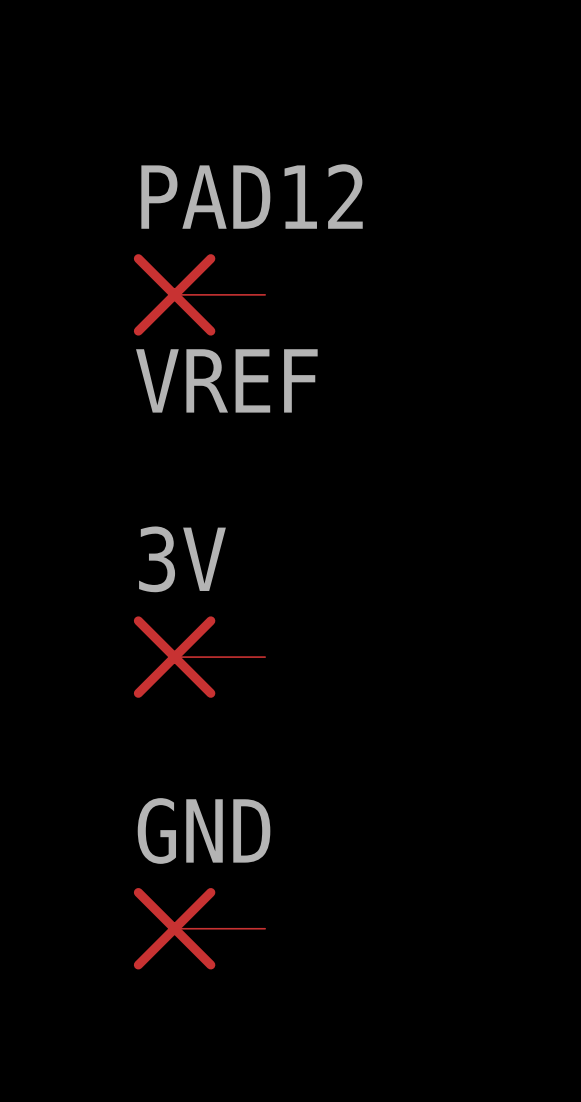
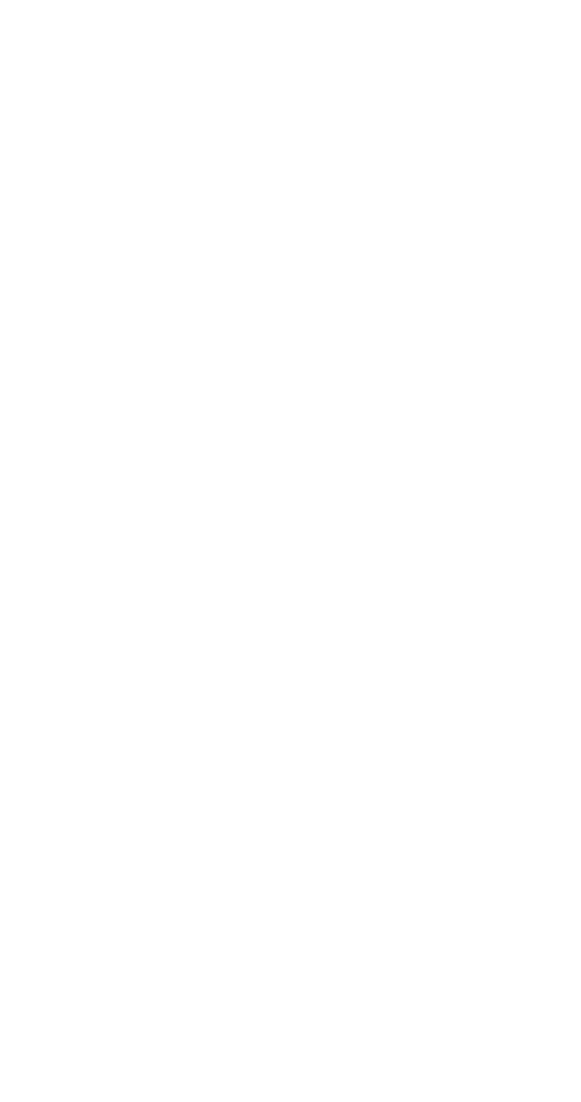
PAD12: VREF (199, 294) -> none
3V: (199, 657) -> none
GND: (199, 928) -> none

